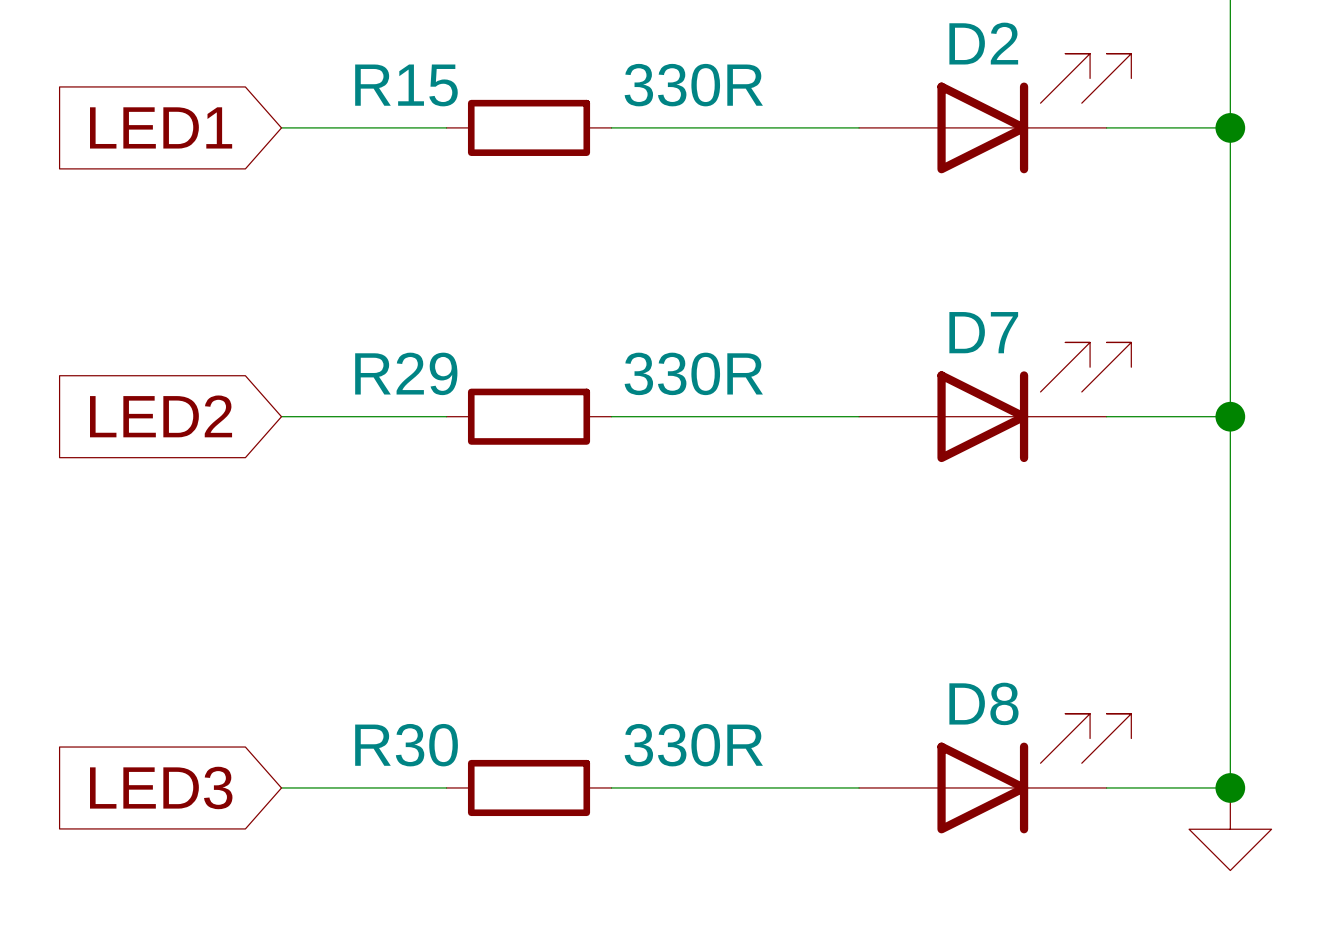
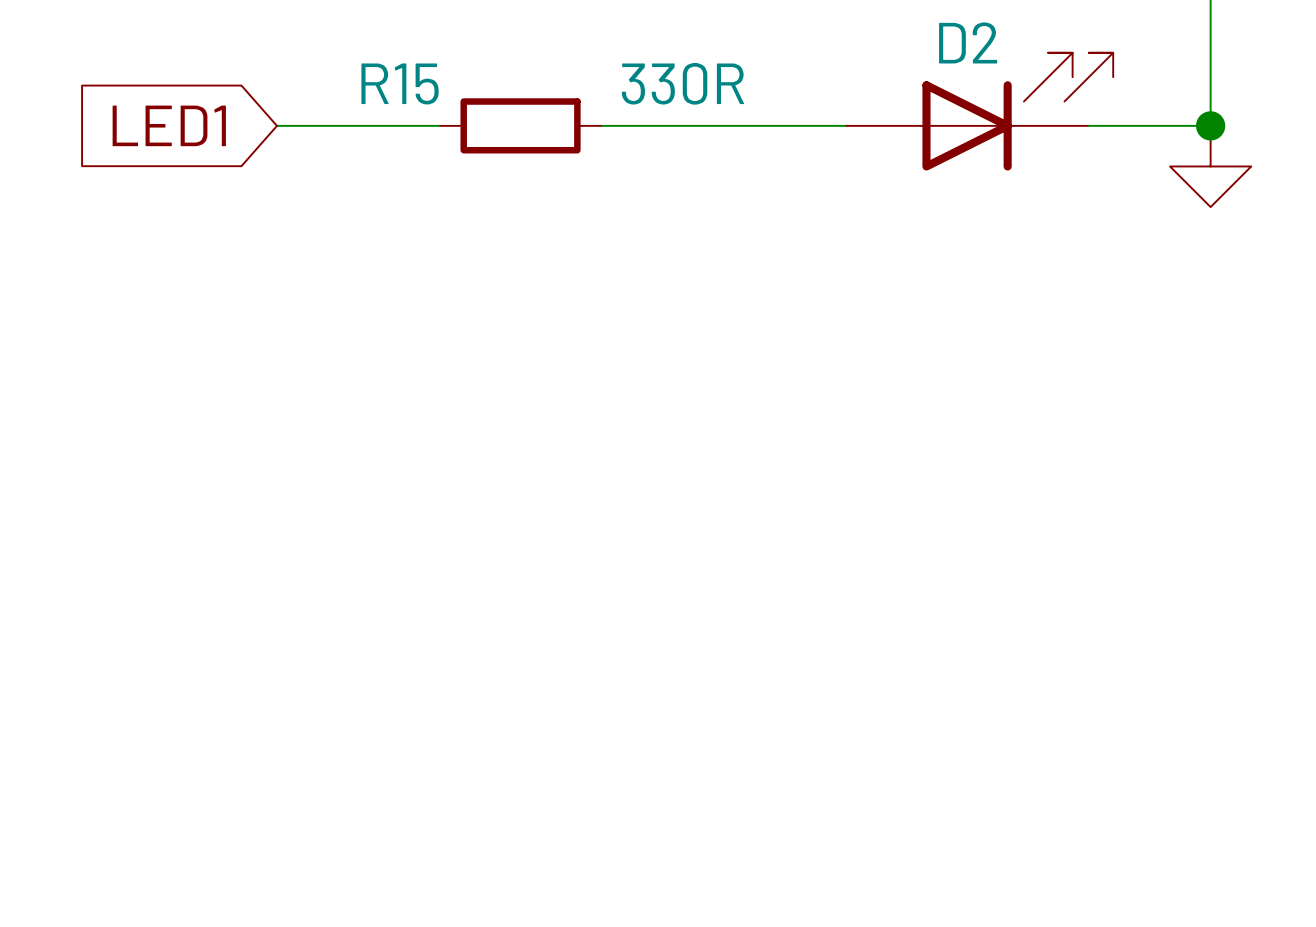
wire: (1230, 127) (1230, 787) (1106, 787) -> none
D7: (995, 402) -> none
global label: LED2 (161, 416) -> none
wire: (281, 416) (446, 416) -> none
R29: 330R (529, 416) -> none
wire: (611, 416) (859, 416) -> none
wire: (1106, 416) (1230, 416) -> none
junction: (1230, 416) -> none
D8: (995, 773) -> none
global label: LED3 (161, 787) -> none
wire: (281, 787) (446, 787) -> none
R30: 330R (529, 787) -> none
wire: (611, 787) (859, 787) -> none
junction: (1230, 787) -> none
power symbol position: (1230, 829) -> (1210, 166)

